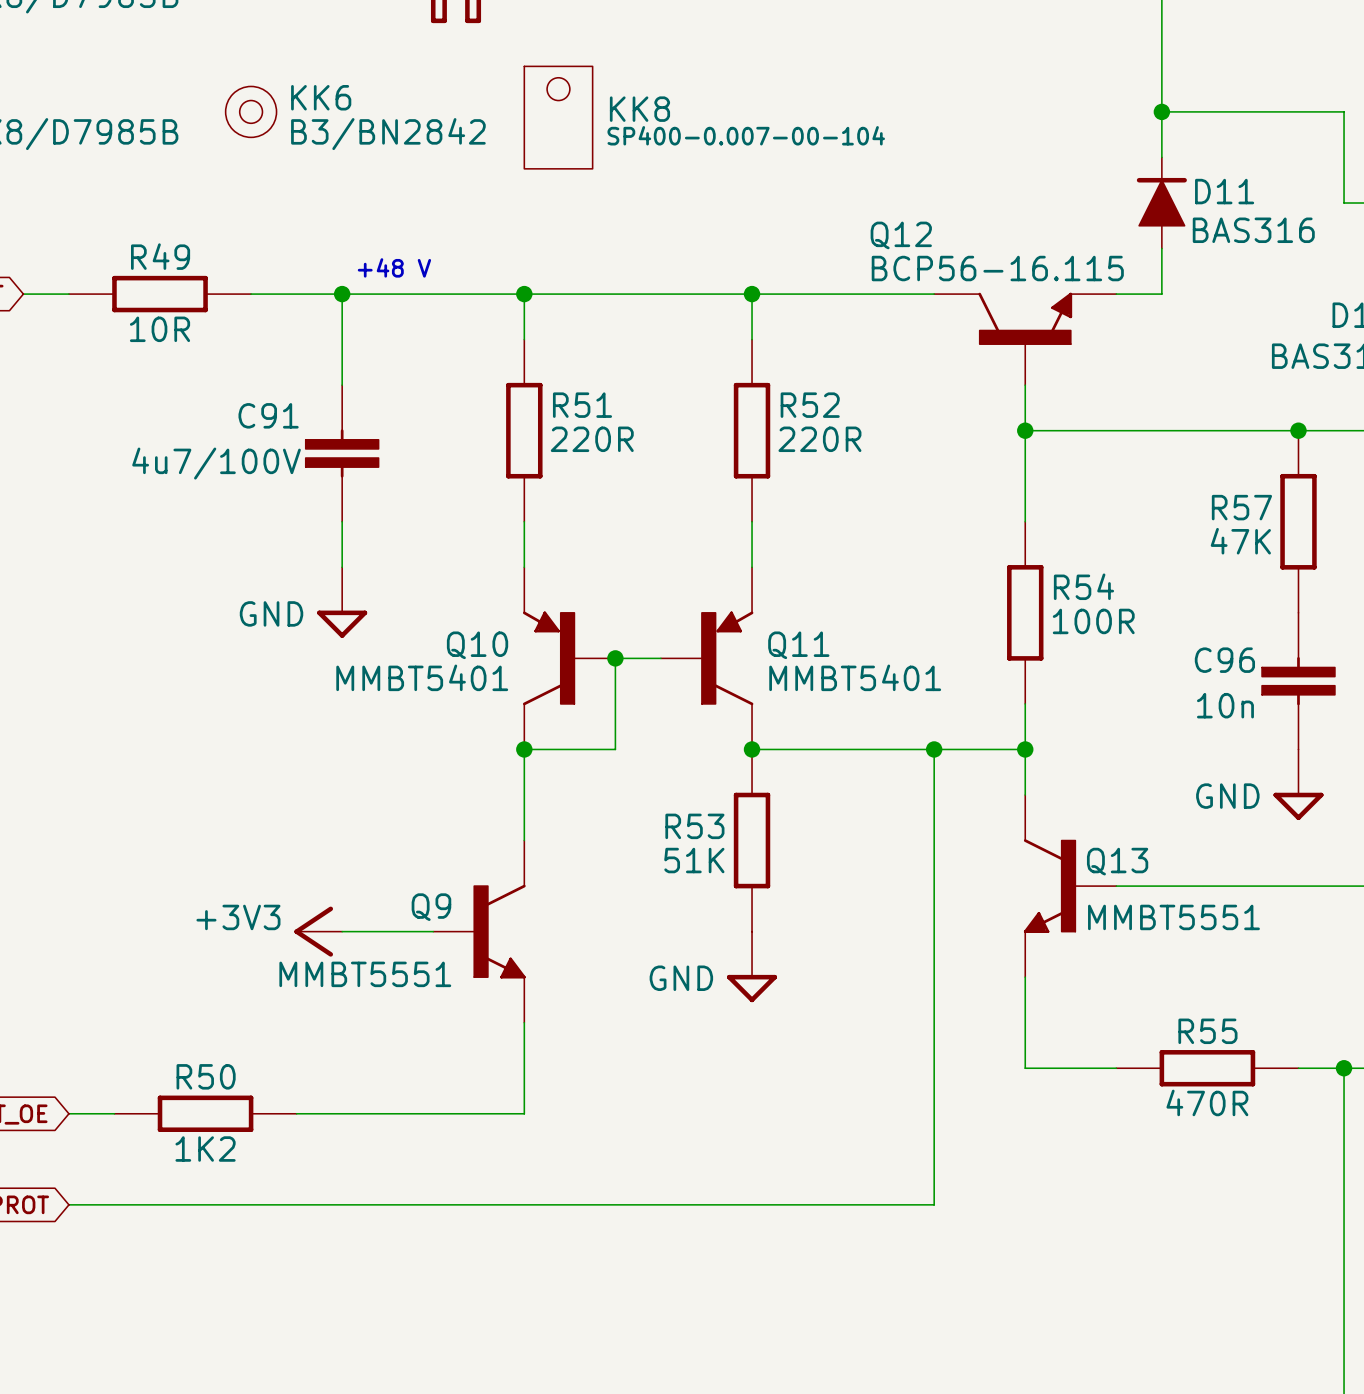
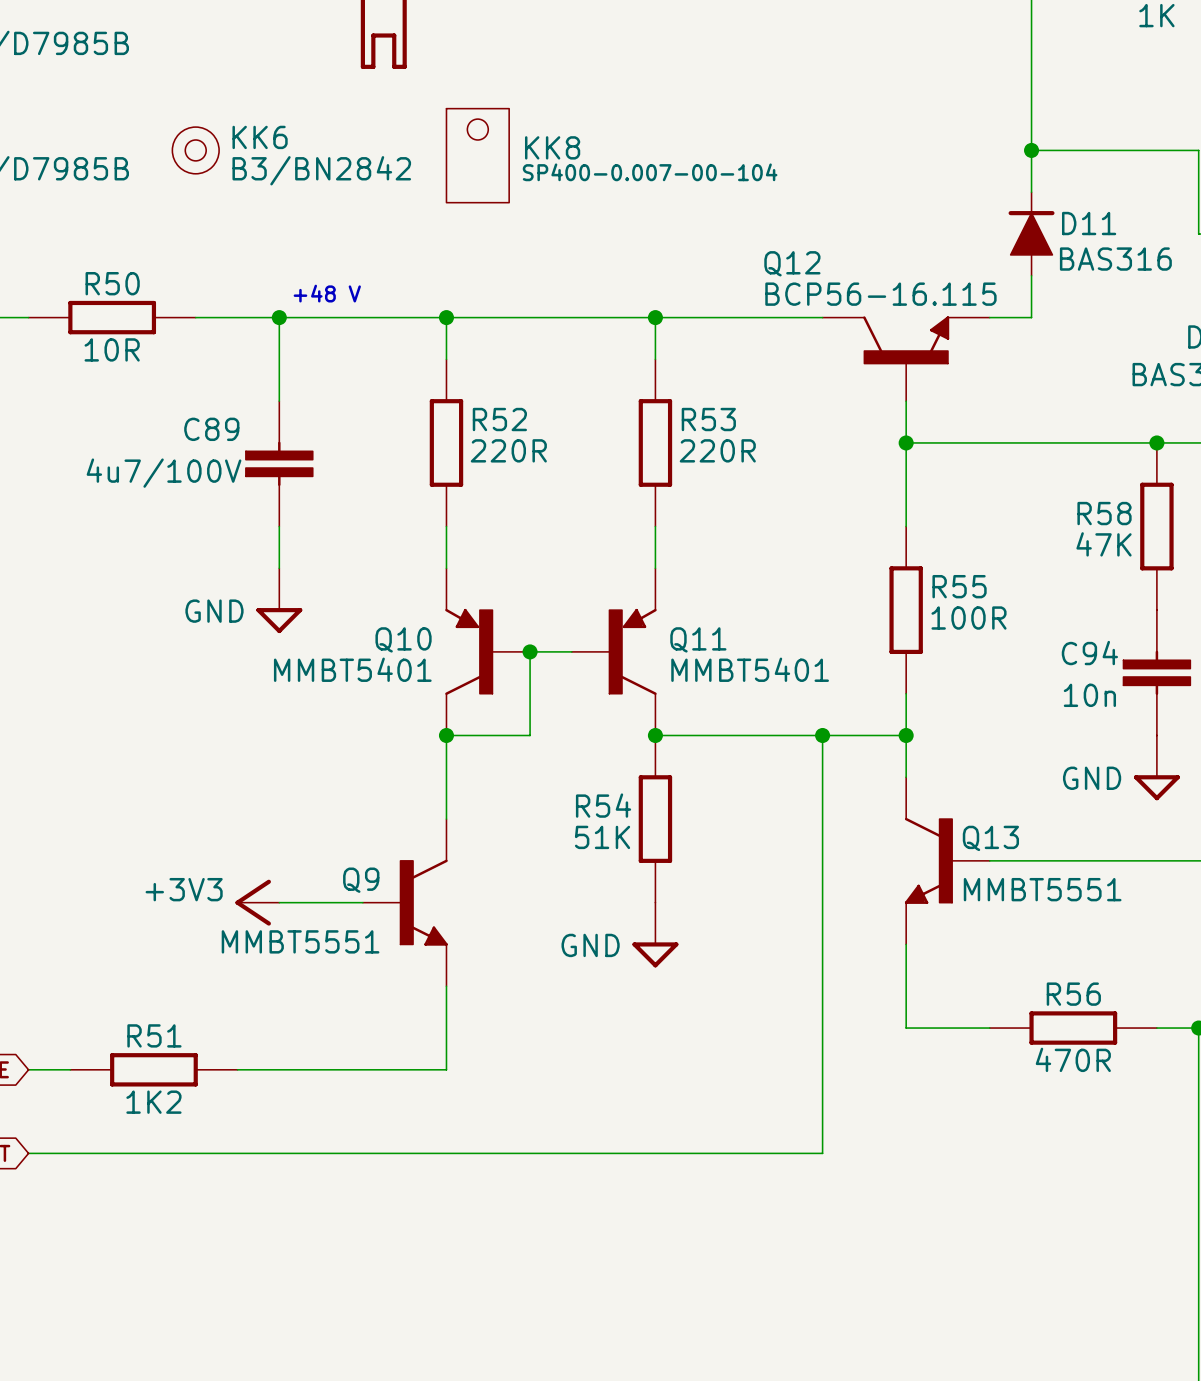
R49 name: R49 (160, 256) -> R50 (112, 283)
R51 name: R51 (582, 405) -> R52 (499, 419)
R52 name: R52 (810, 405) -> R53 (708, 419)
C91 name: C91 (268, 415) -> C89 (211, 429)
R57 name: R57 (1241, 507) -> R58 (1104, 513)
R54 name: R54 (1083, 586) -> R55 (959, 586)
C96 name: C96 (1224, 660) -> C94 (1089, 653)
R53 name: R53 (694, 826) -> R54 (603, 805)
R55 name: R55 (1207, 1031) -> R56 (1073, 994)
R50 name: R50 (206, 1076) -> R51 (154, 1035)

